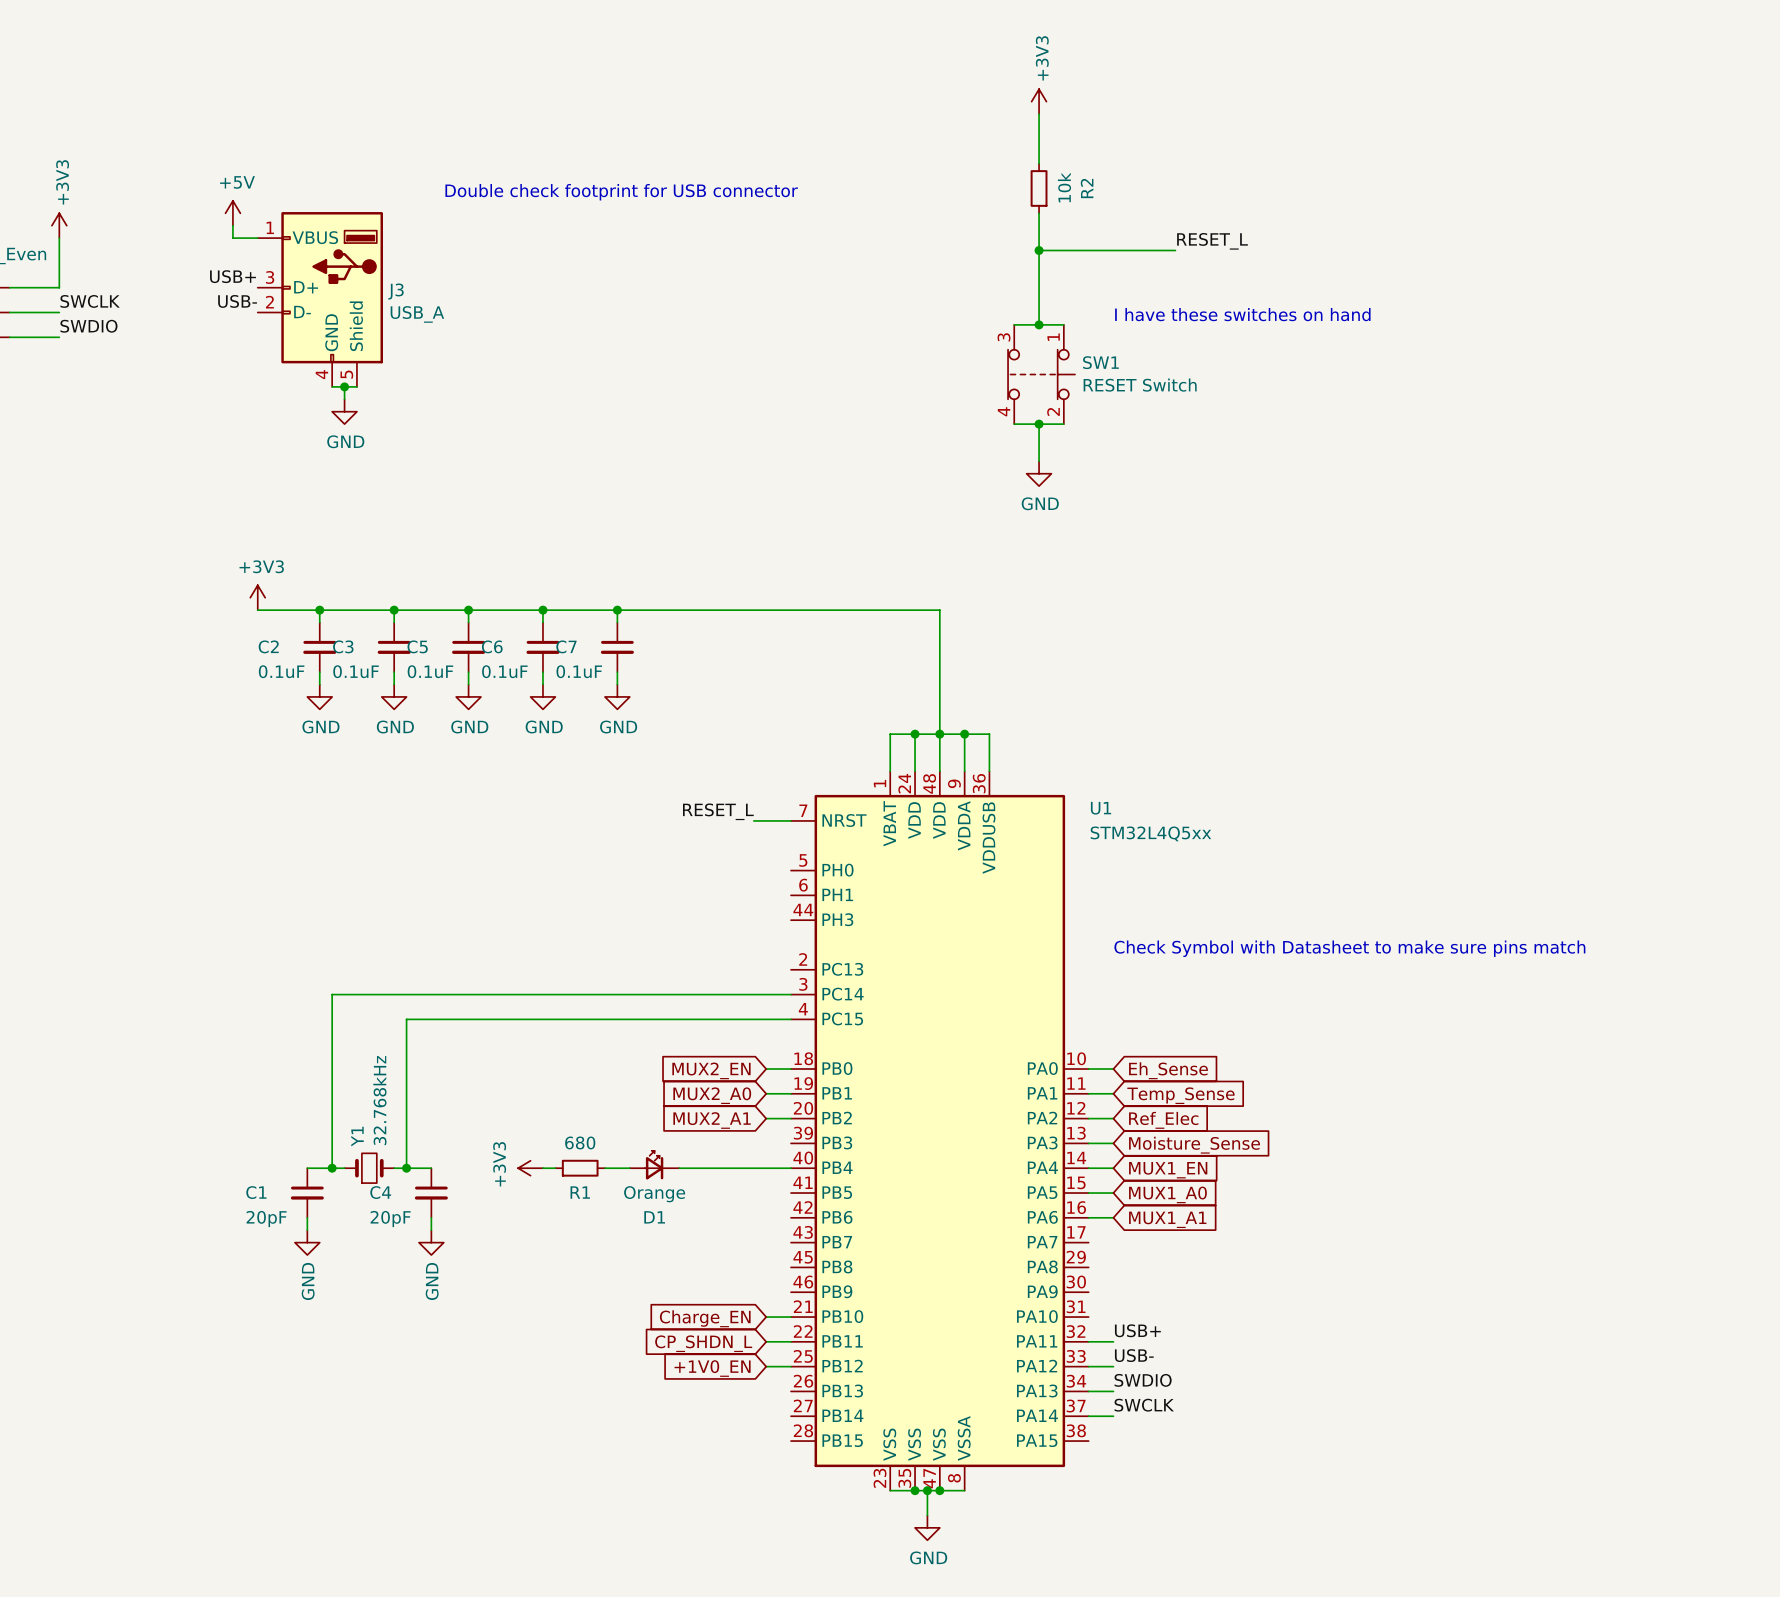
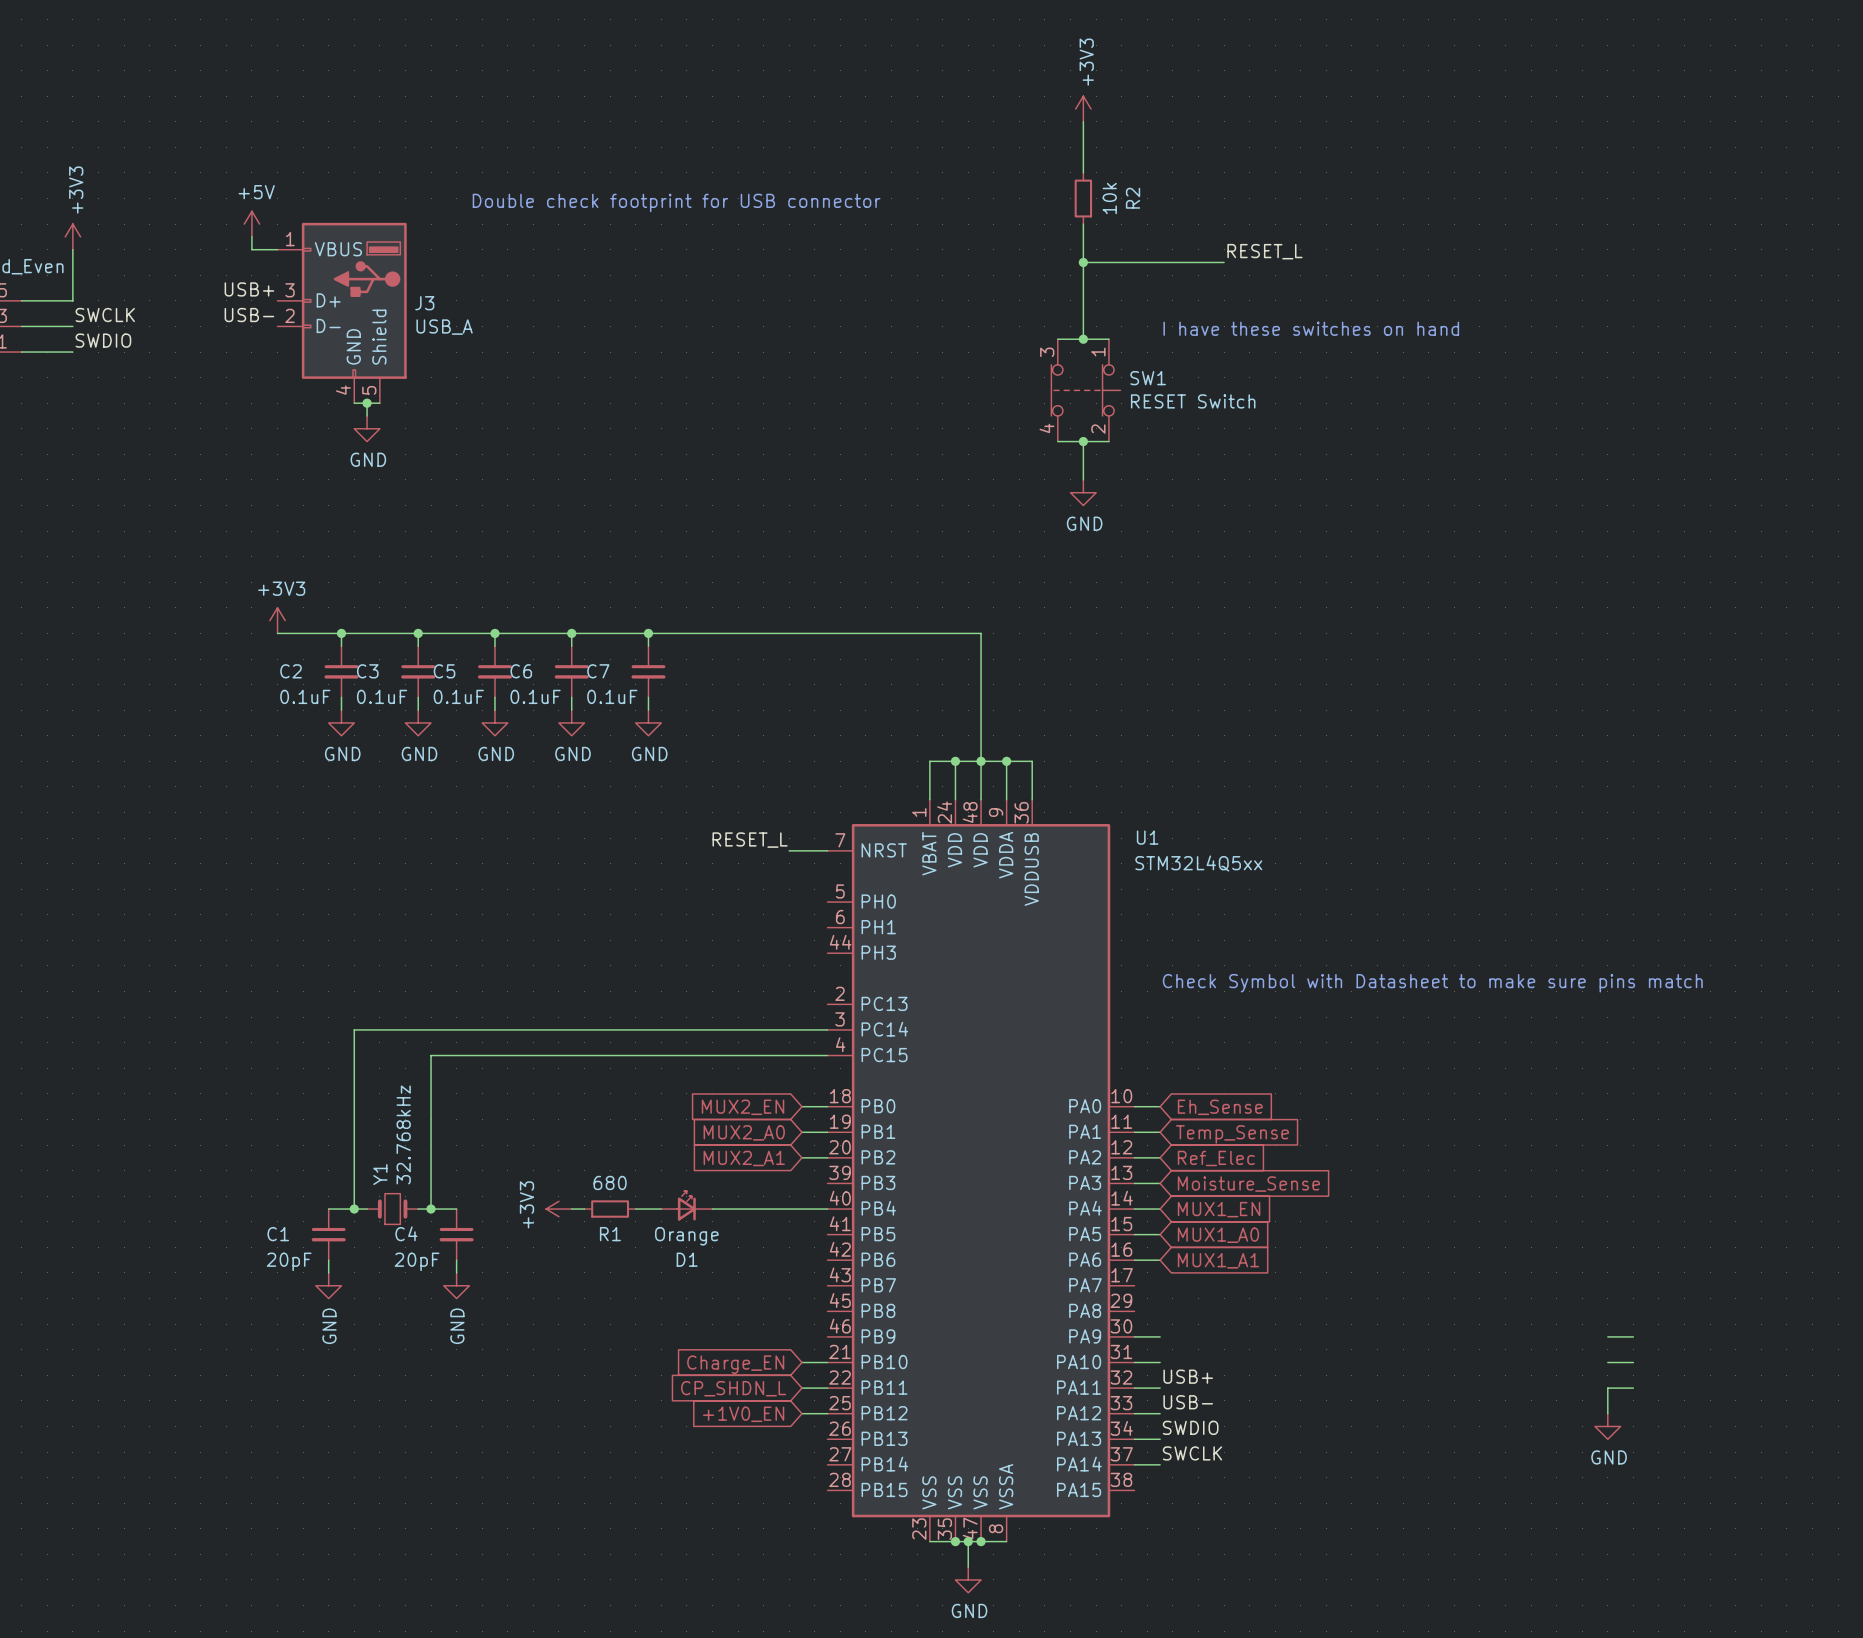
wire: none -> (1134, 1336) (1160, 1336)
wire: none -> (1607, 1336) (1633, 1336)
wire: none -> (1134, 1362) (1160, 1362)
wire: none -> (1607, 1362) (1633, 1362)
wire: none -> (1633, 1388) (1607, 1388) (1607, 1413)
power symbol: none -> GND (1607, 1426)

